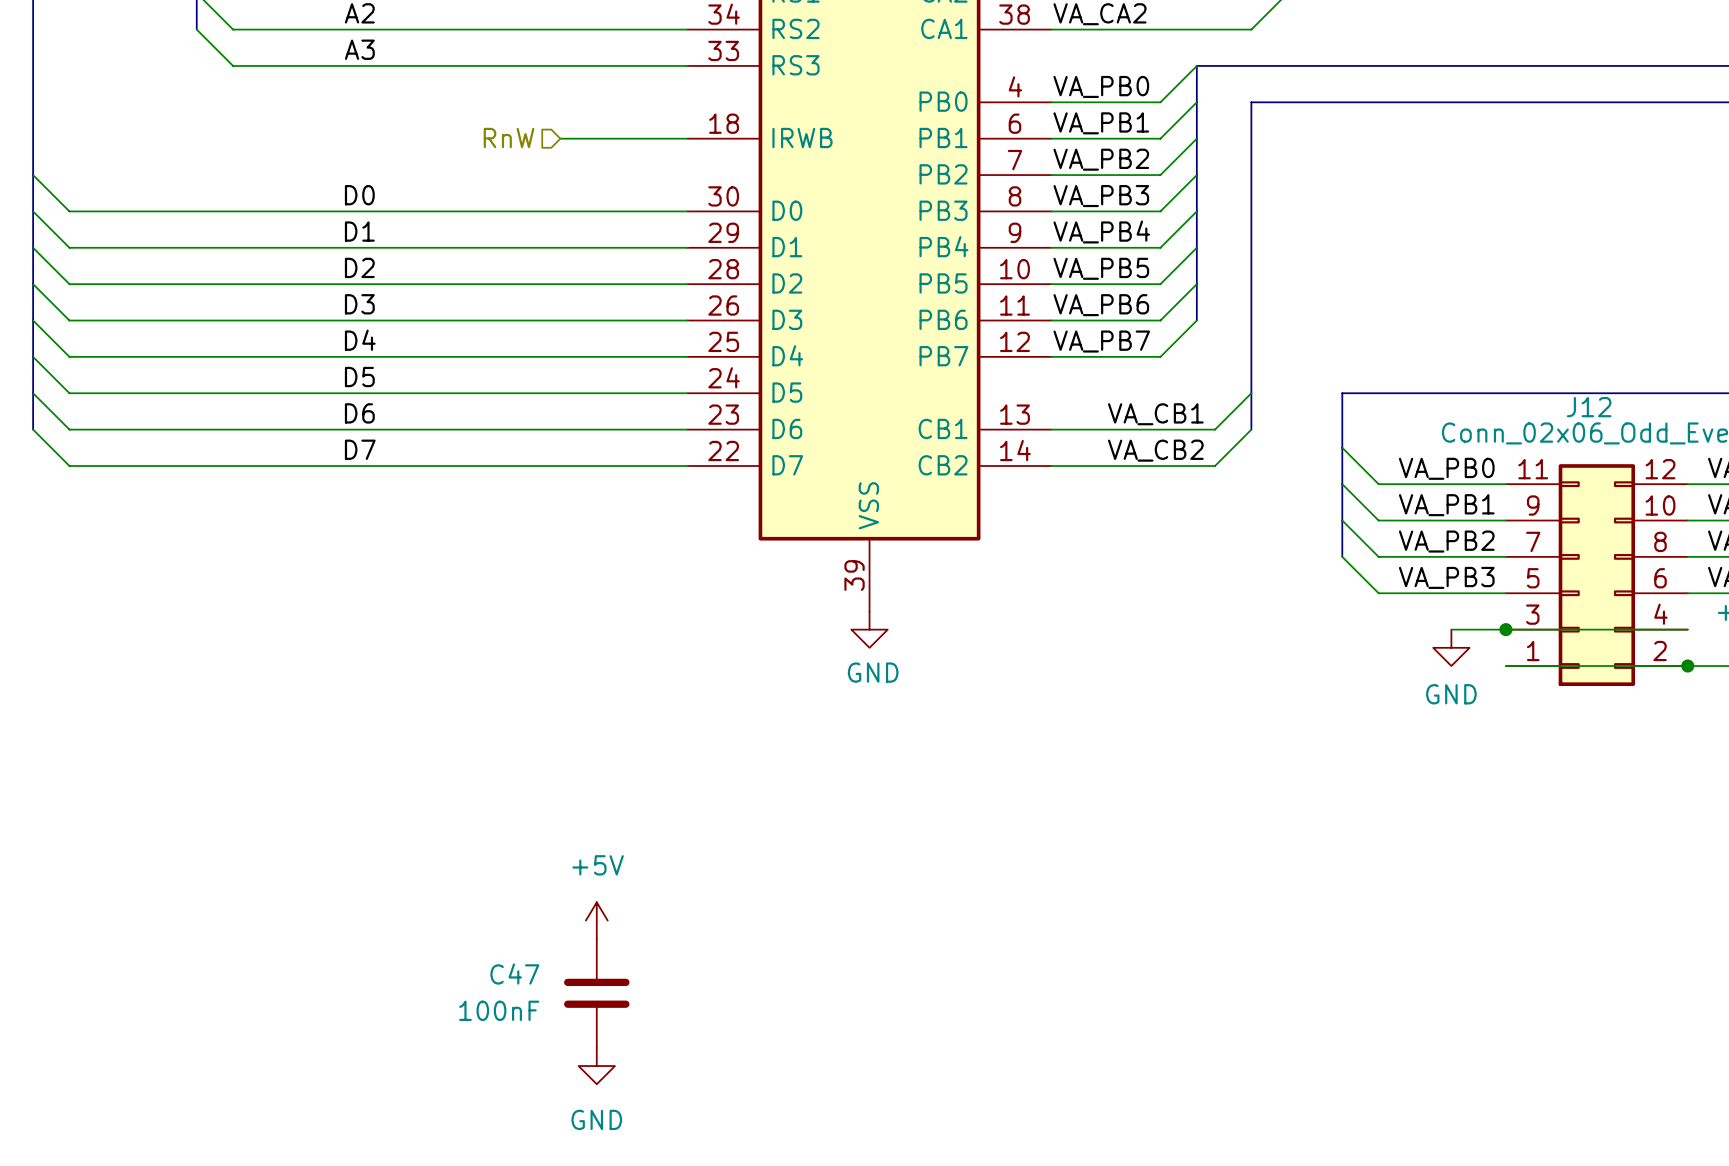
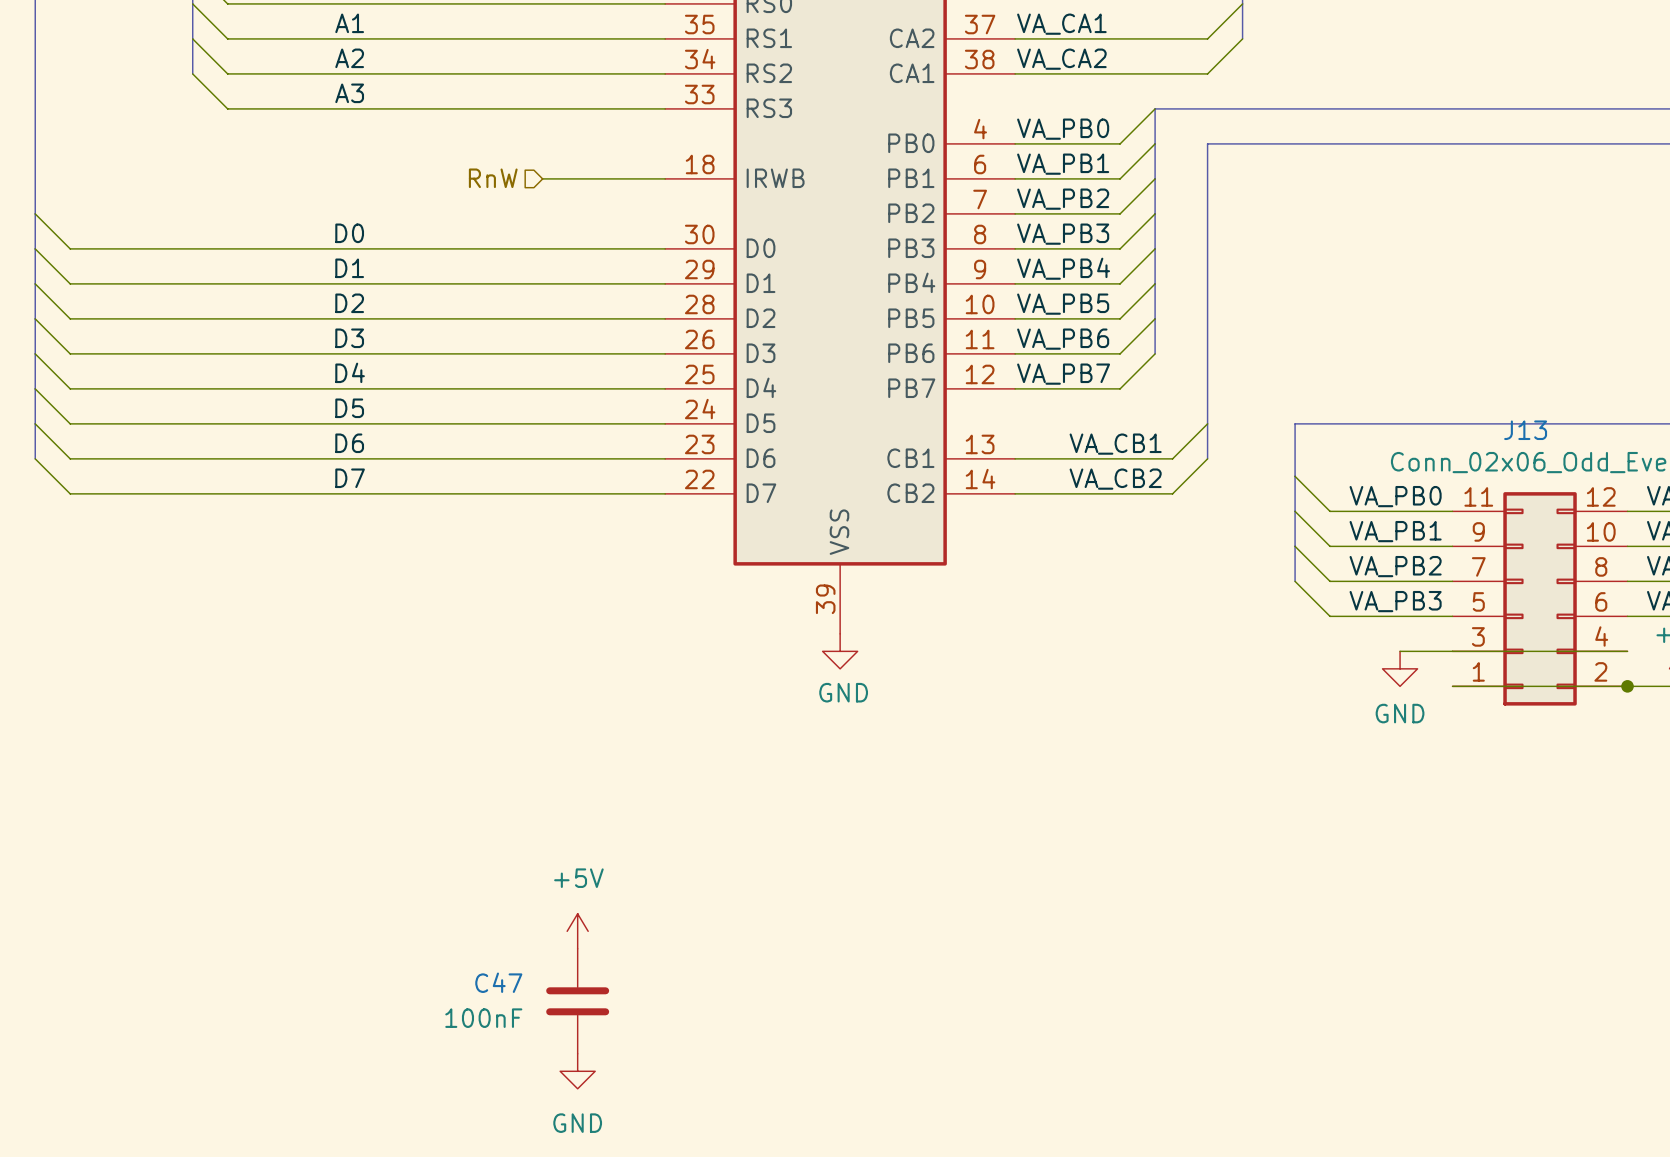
J12 name: J12 (1589, 407) -> J13 (1525, 430)
junction: (1505, 629) -> none

